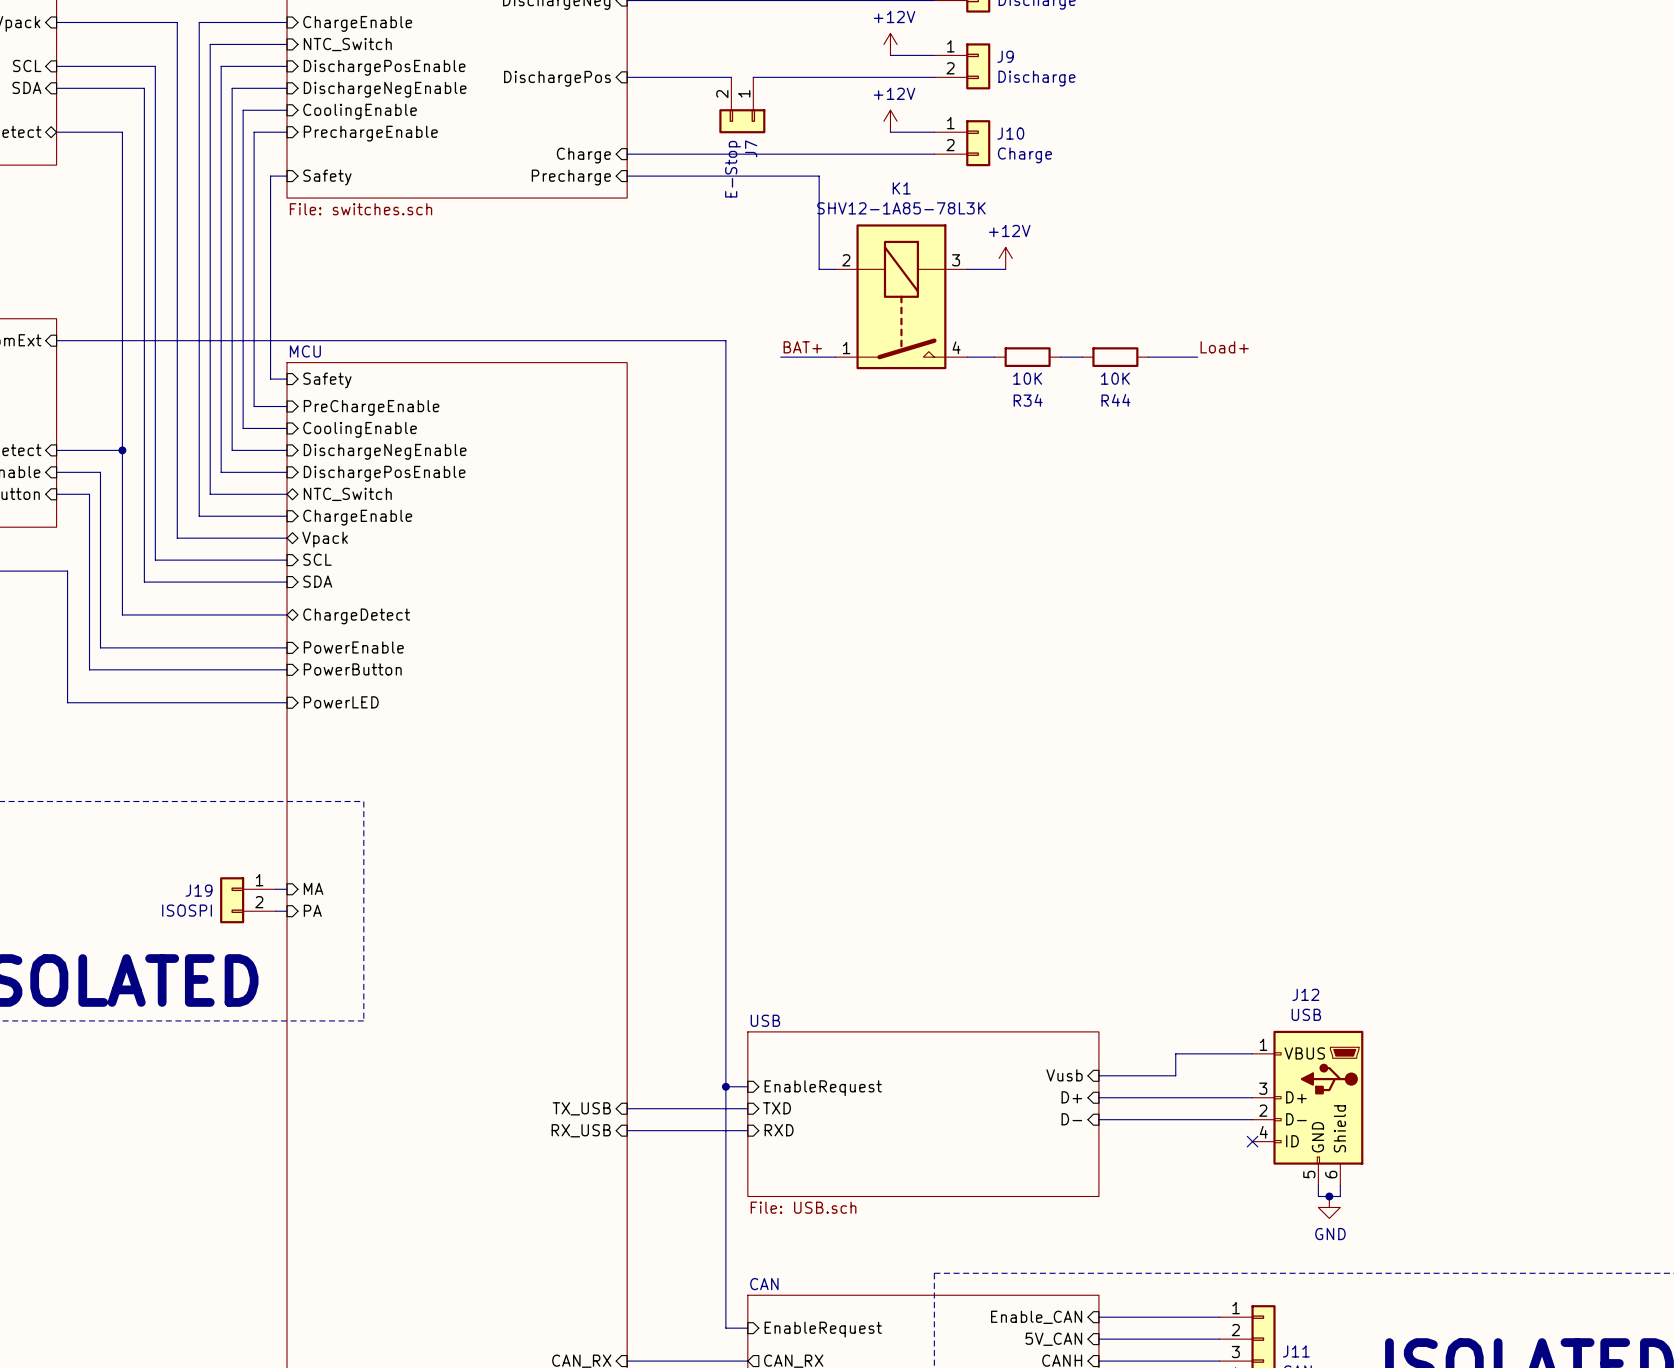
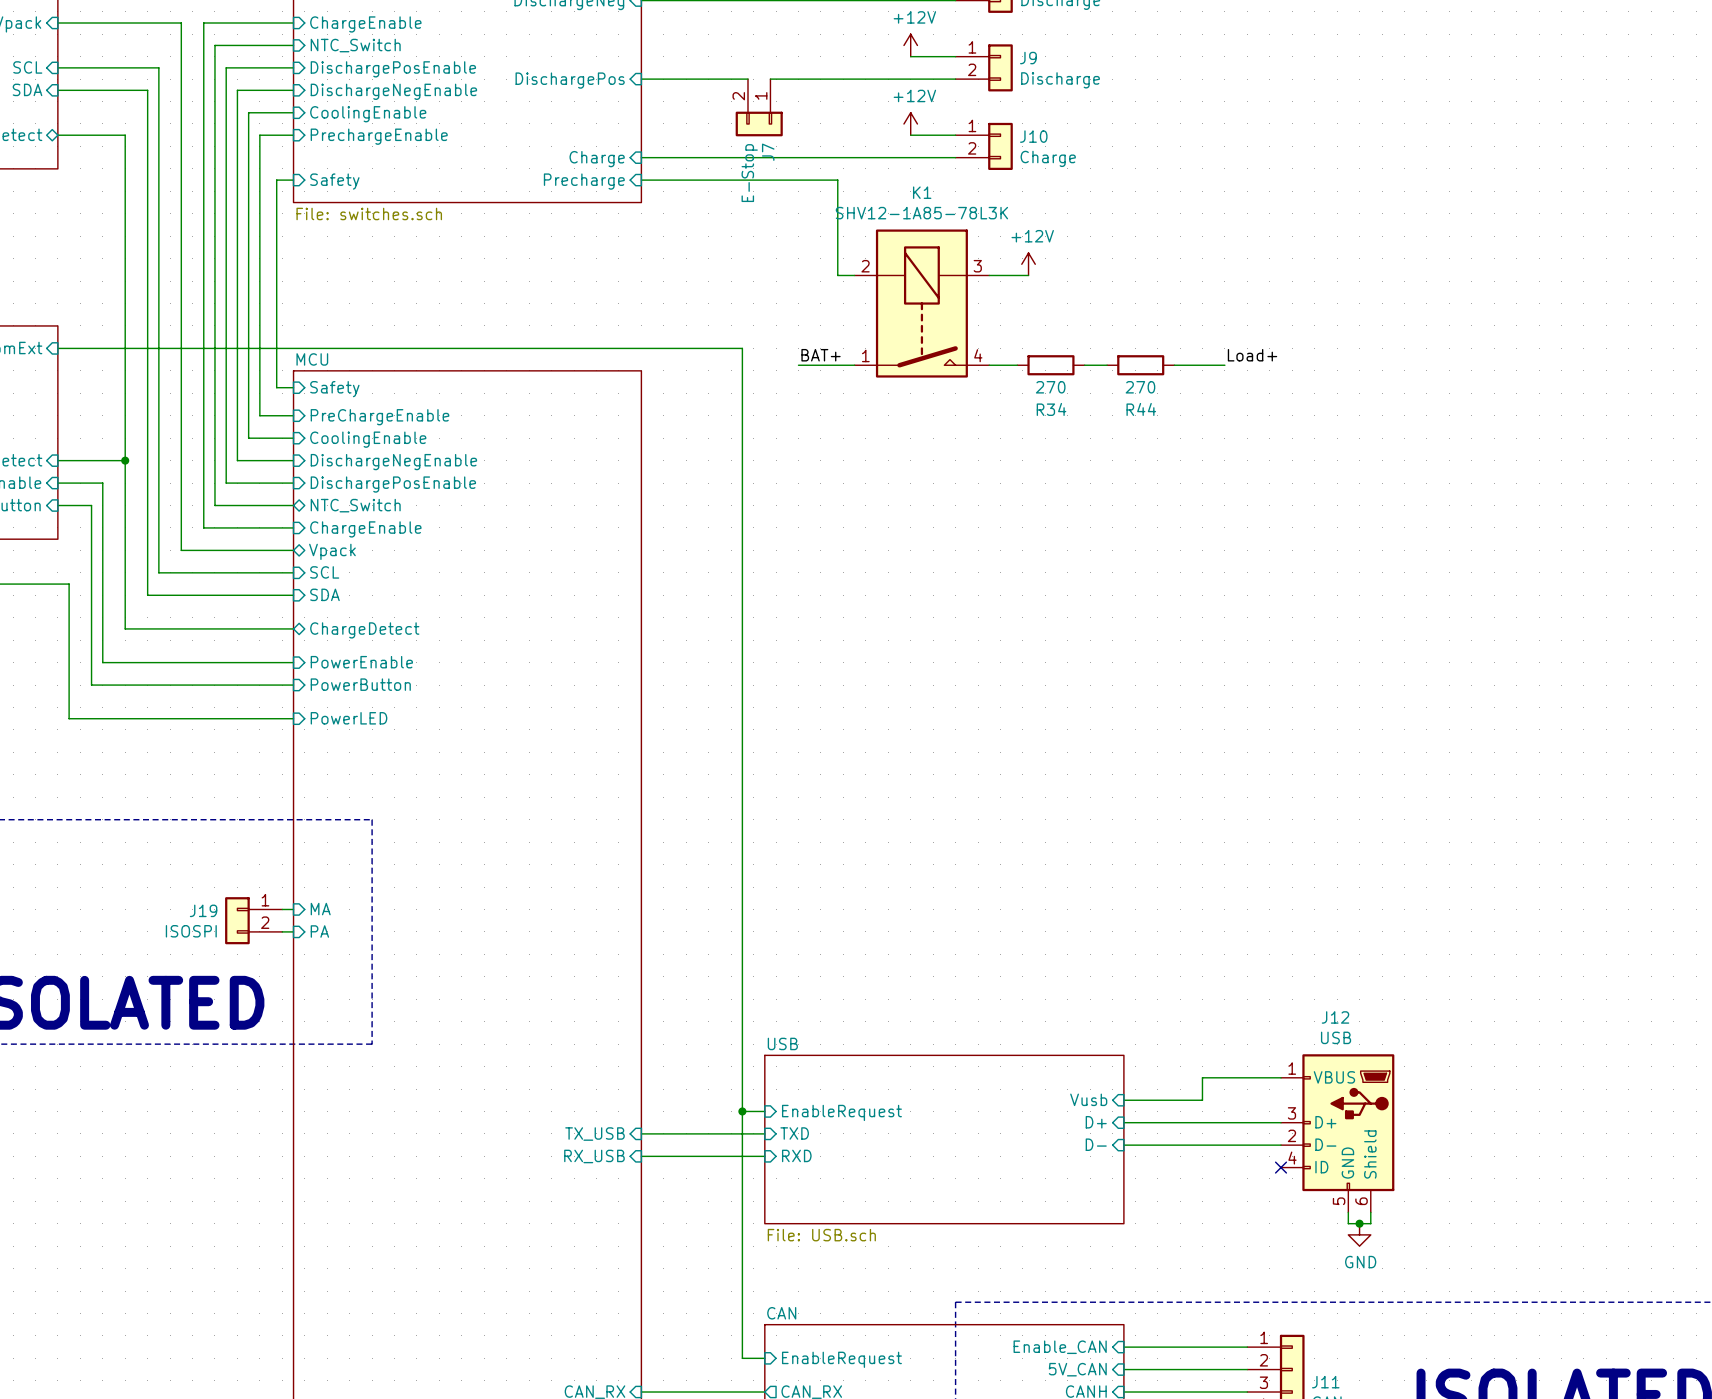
R34 value: 10K (1027, 378) -> 270 (1050, 387)
R44 value: 10K (1115, 378) -> 270 (1140, 387)

